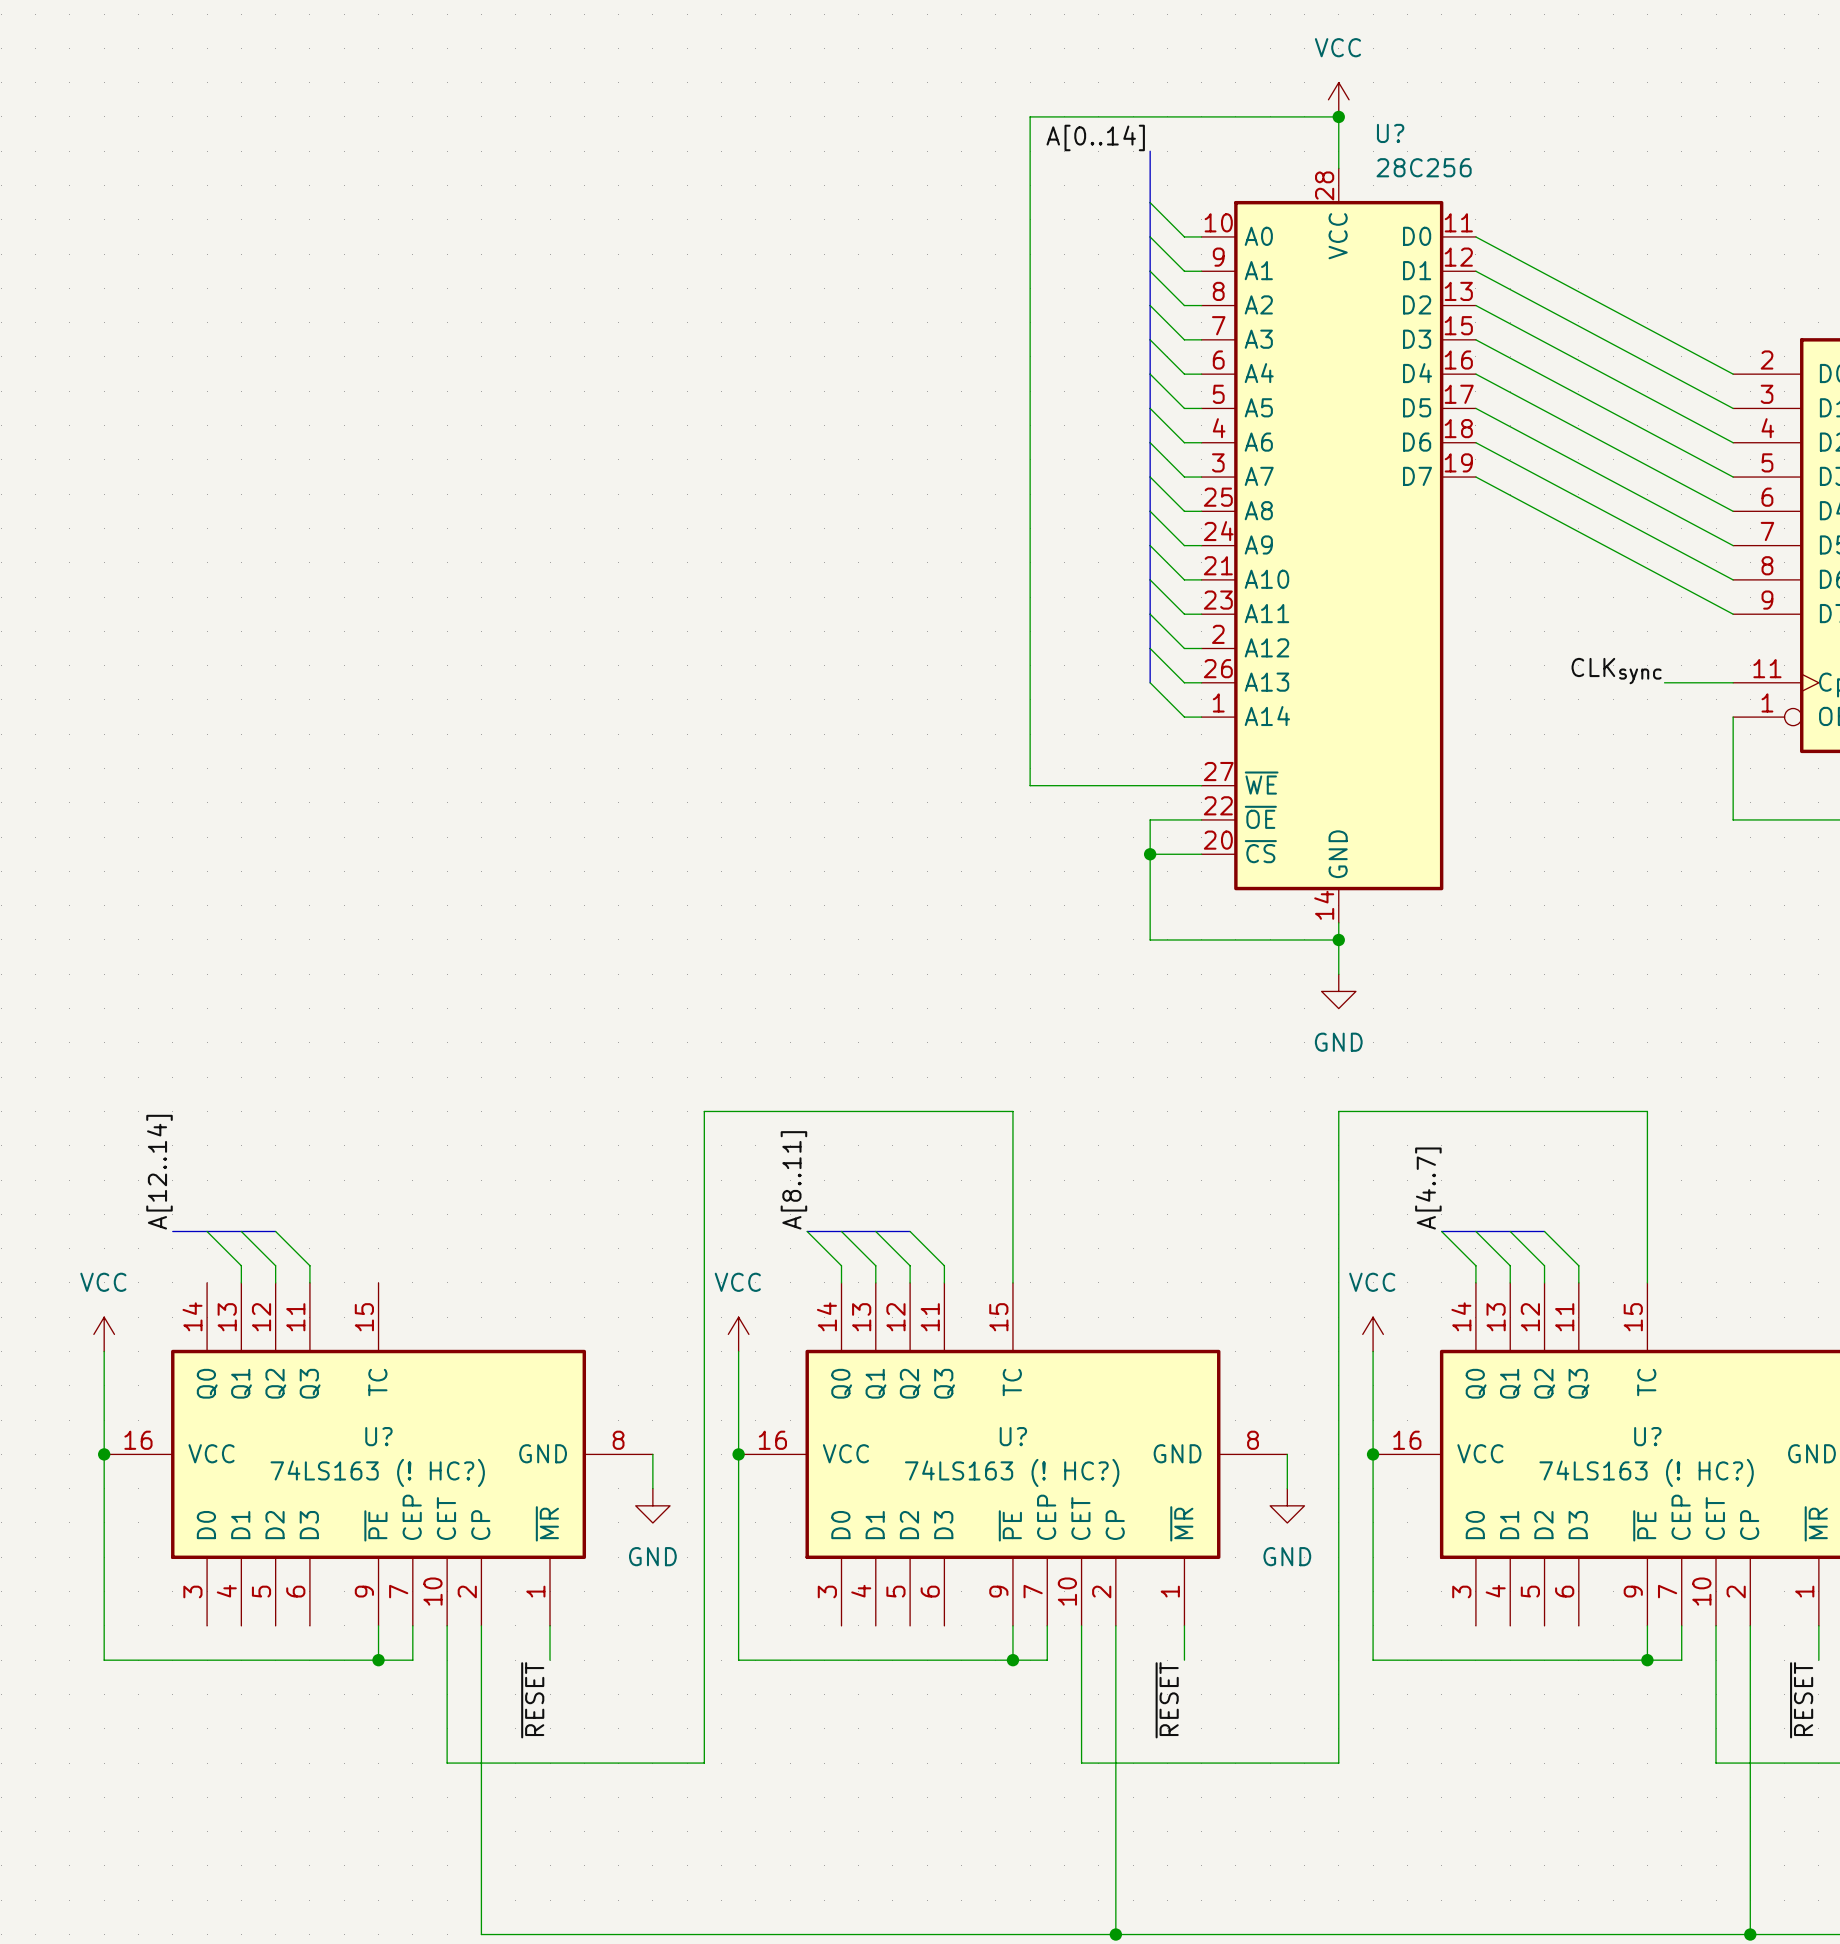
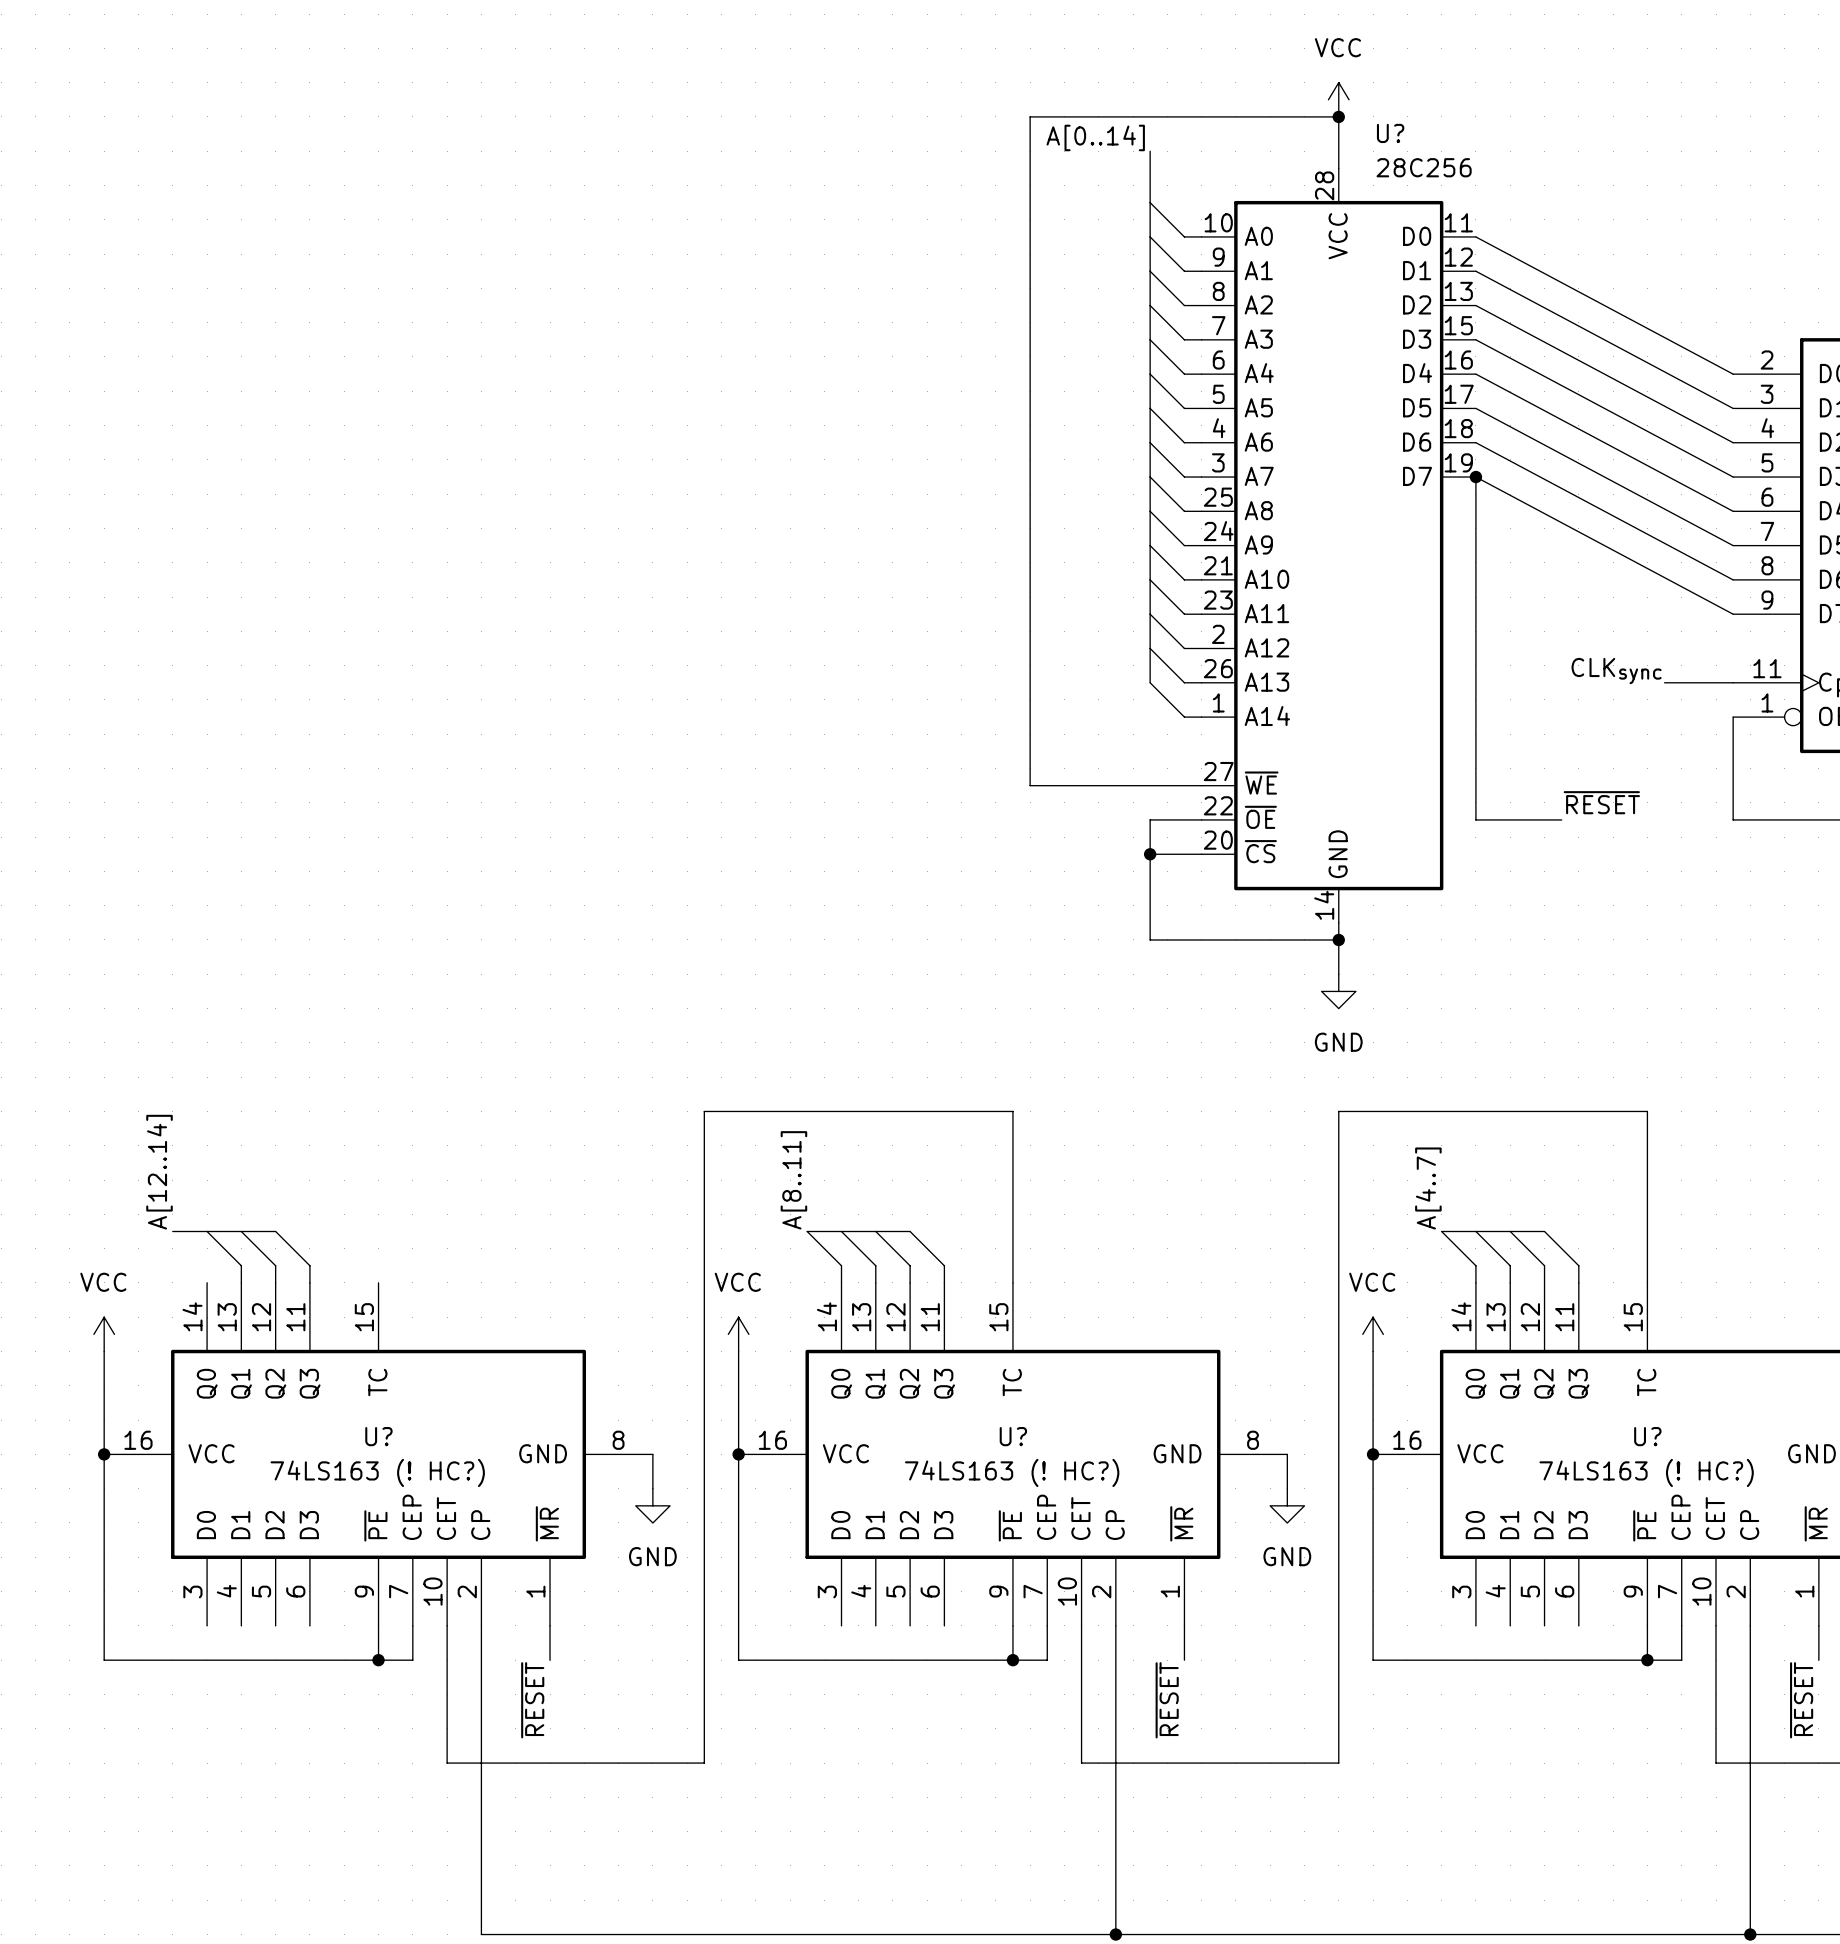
wire: none -> (1475, 477) (1475, 819) (1561, 819)
junction: none -> (1475, 477)
label: none -> ~{RESET} (1601, 802)

